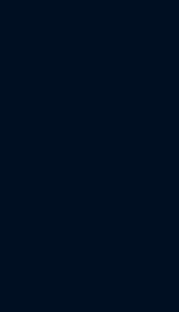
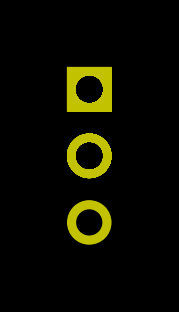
part: none -> (89, 122)
part: none -> (89, 155)

